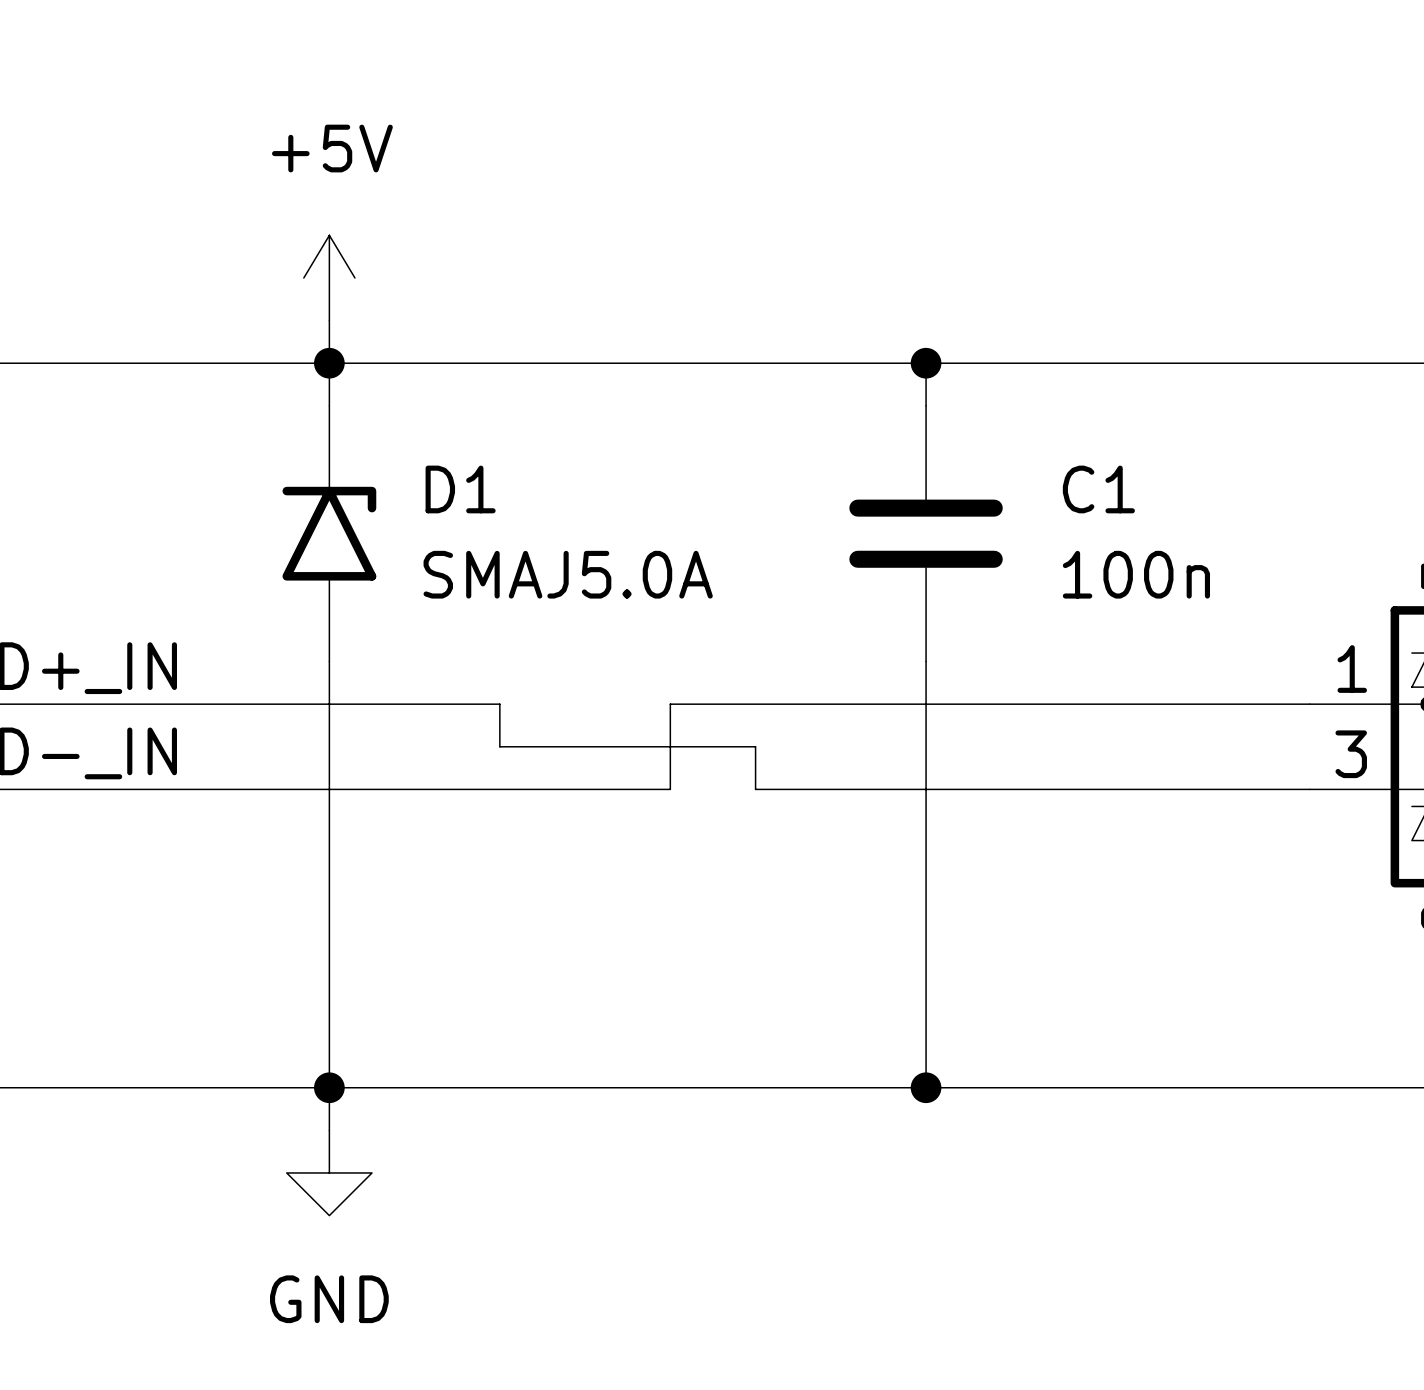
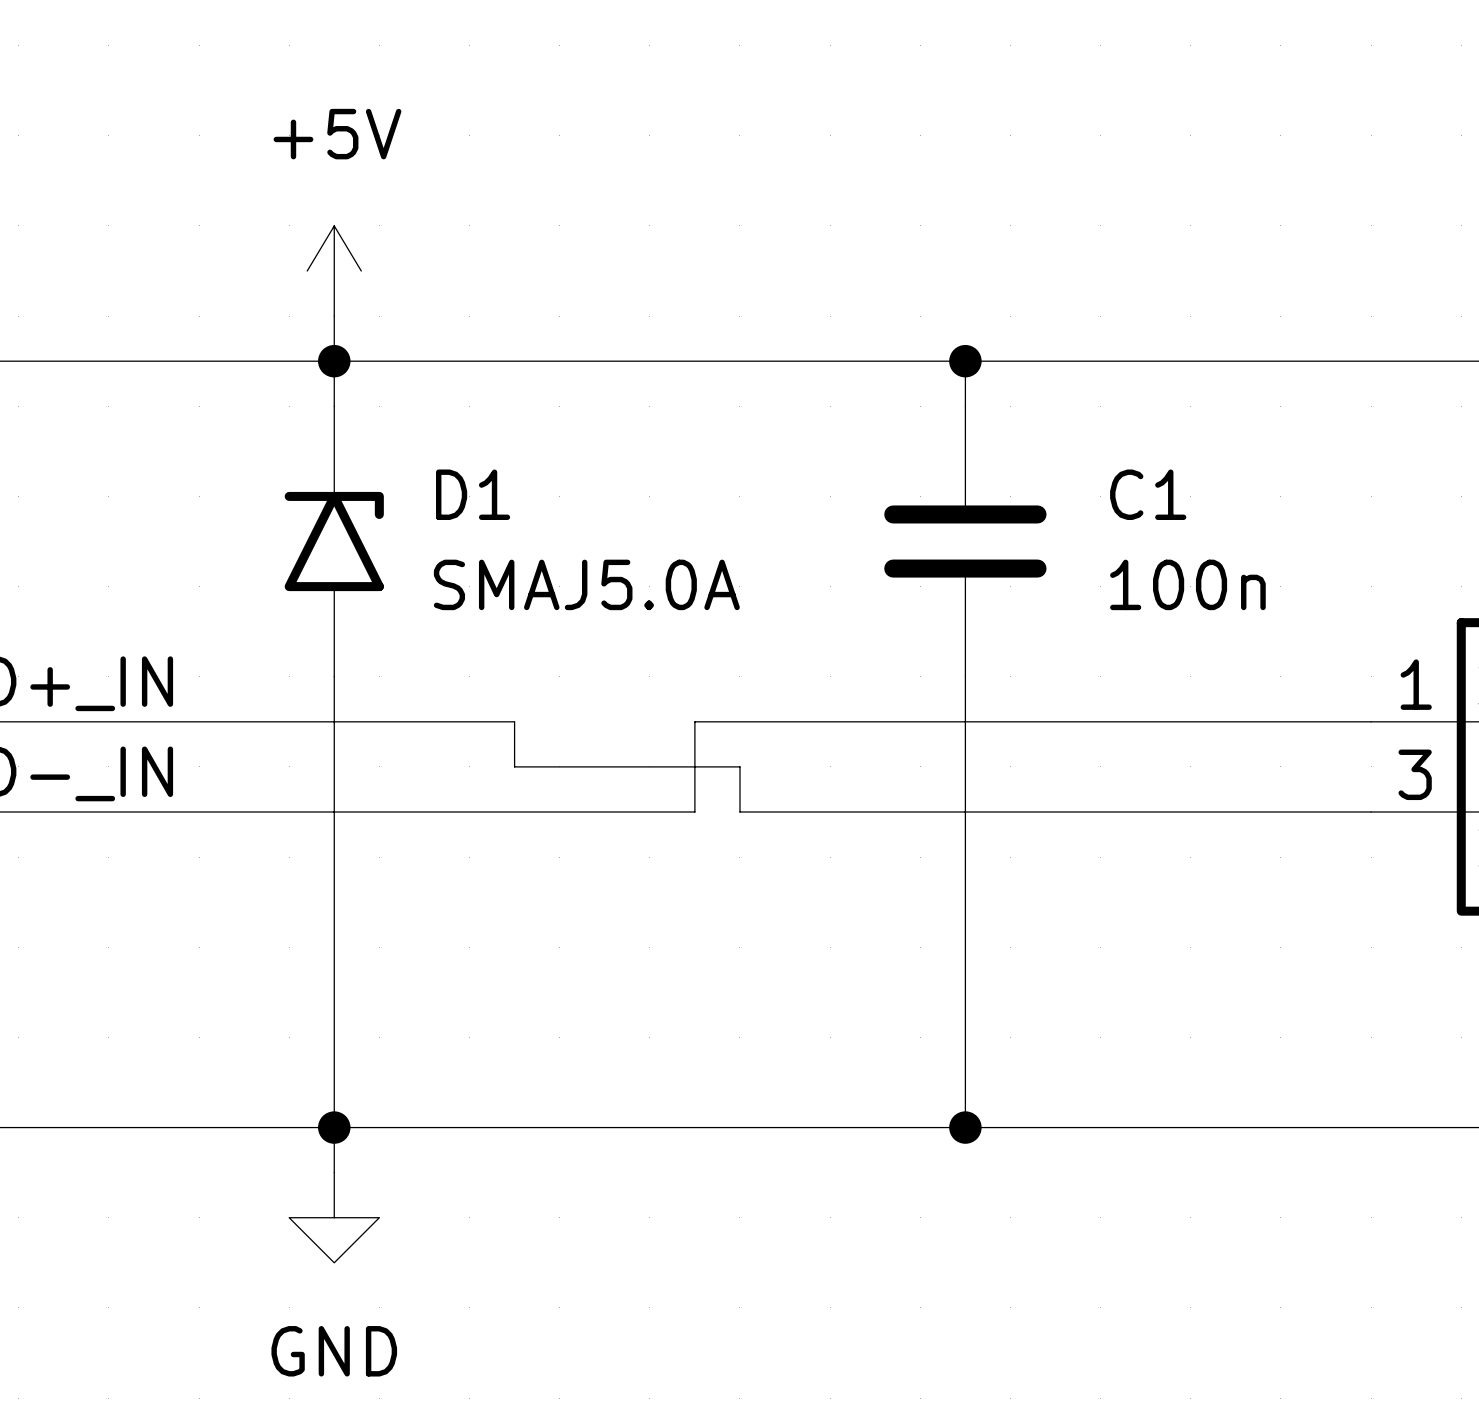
wire: (712, 746) (755, 746) (755, 789) -> (739, 766) (739, 811) (785, 811)

